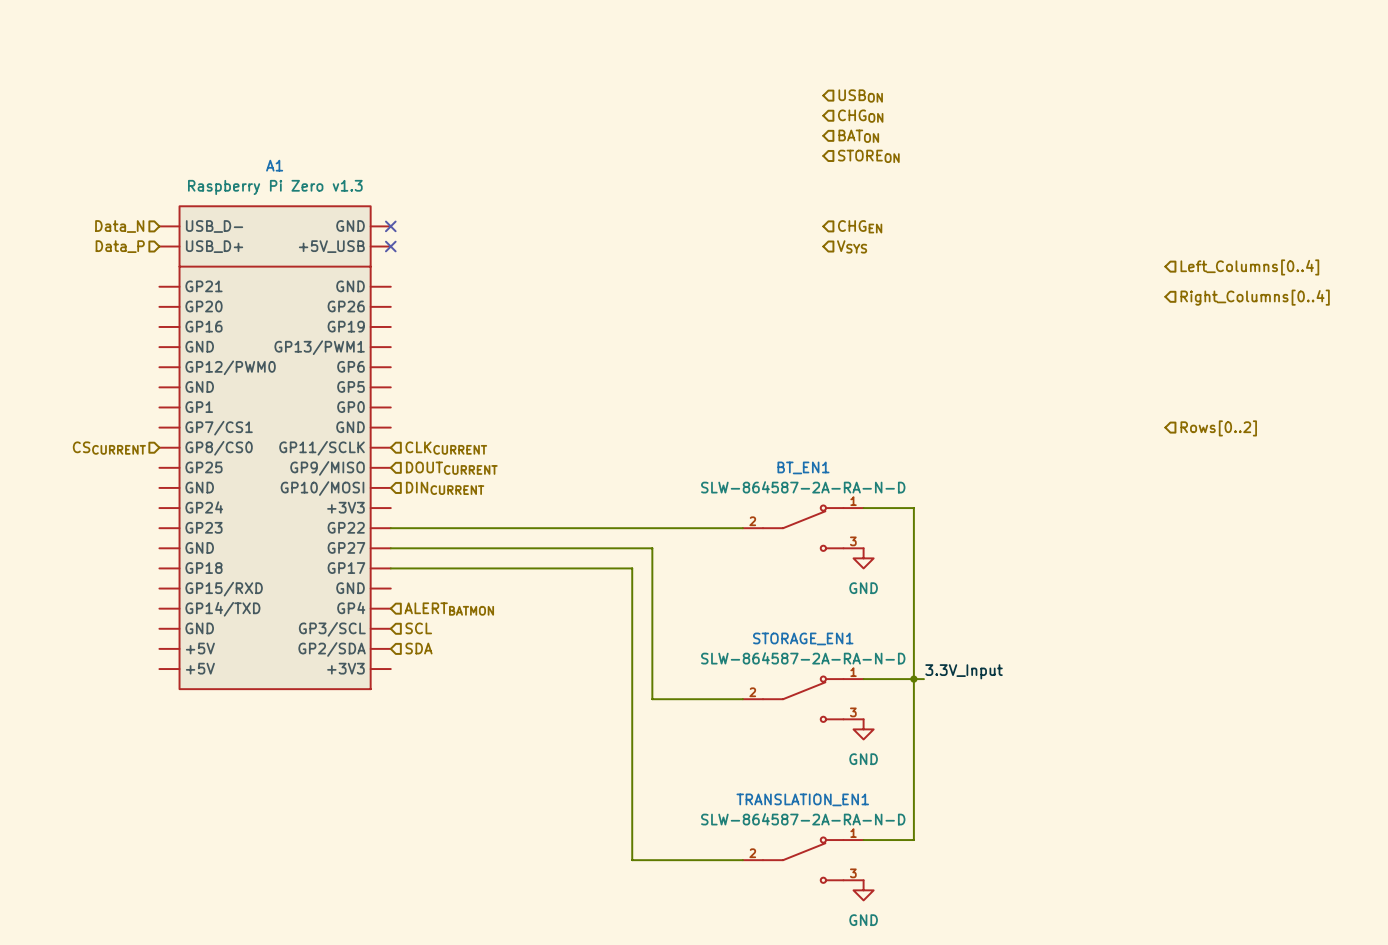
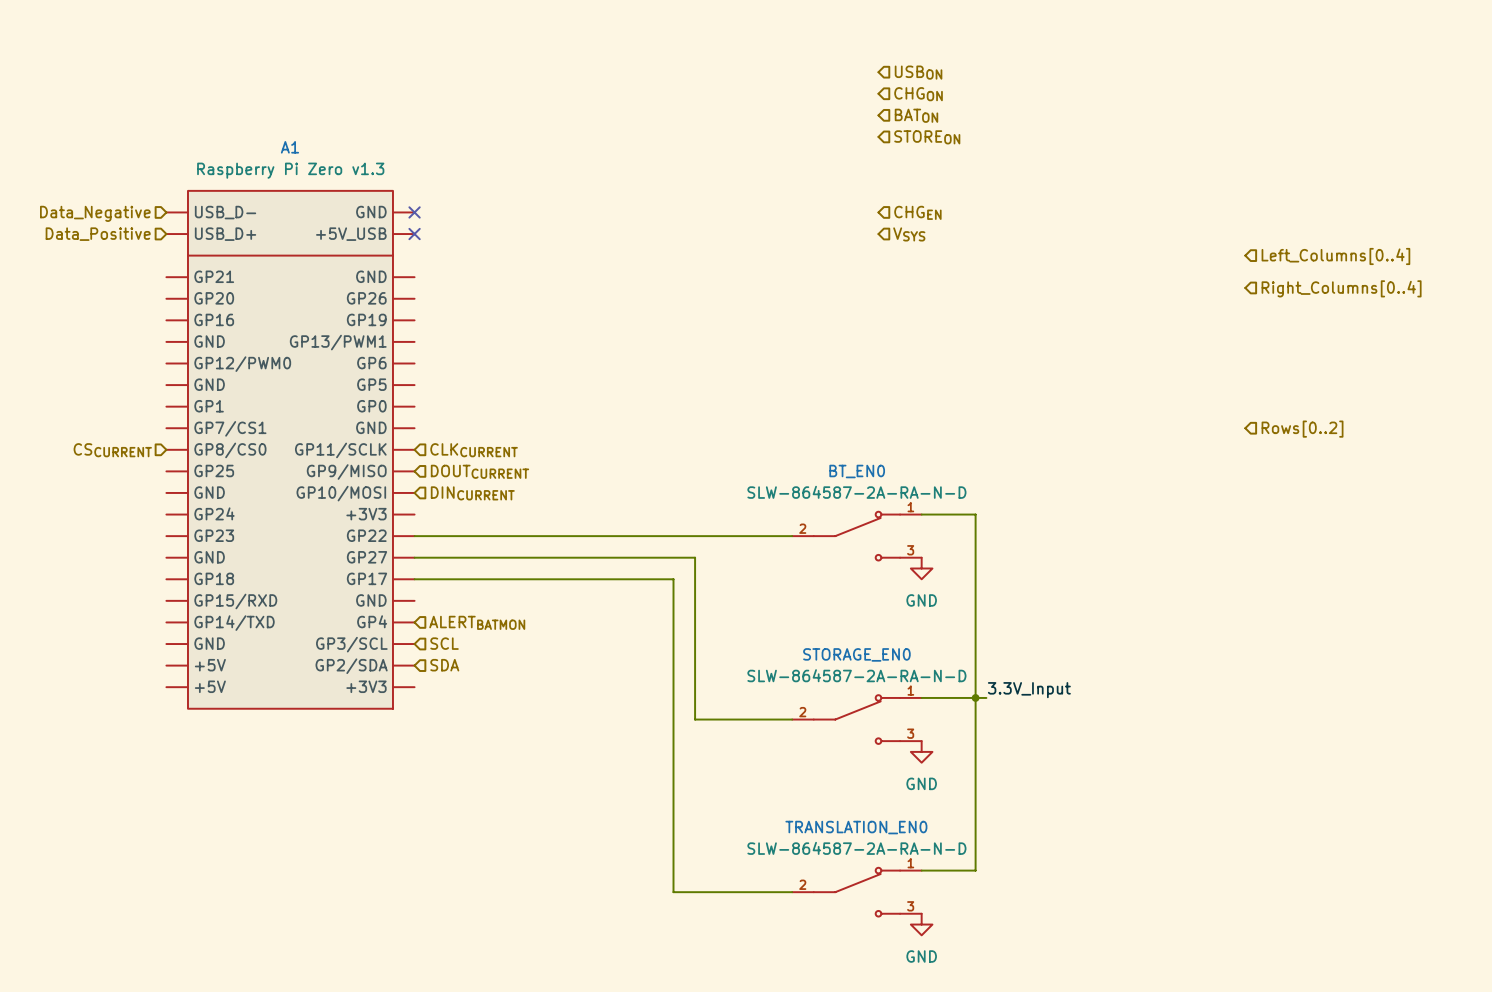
hierarchical label: Data_N (119, 226) -> Data_Negative (95, 213)
hierarchical label: Data_P (120, 246) -> Data_Positive (98, 234)
BT_EN1 name: BT_EN1 (803, 467) -> BT_EN0 (857, 471)
STORAGE_EN1 name: STORAGE_EN1 (803, 638) -> STORAGE_EN0 (856, 654)
TRANSLATION_EN1 name: TRANSLATION_EN1 (802, 799) -> TRANSLATION_EN0 (856, 827)

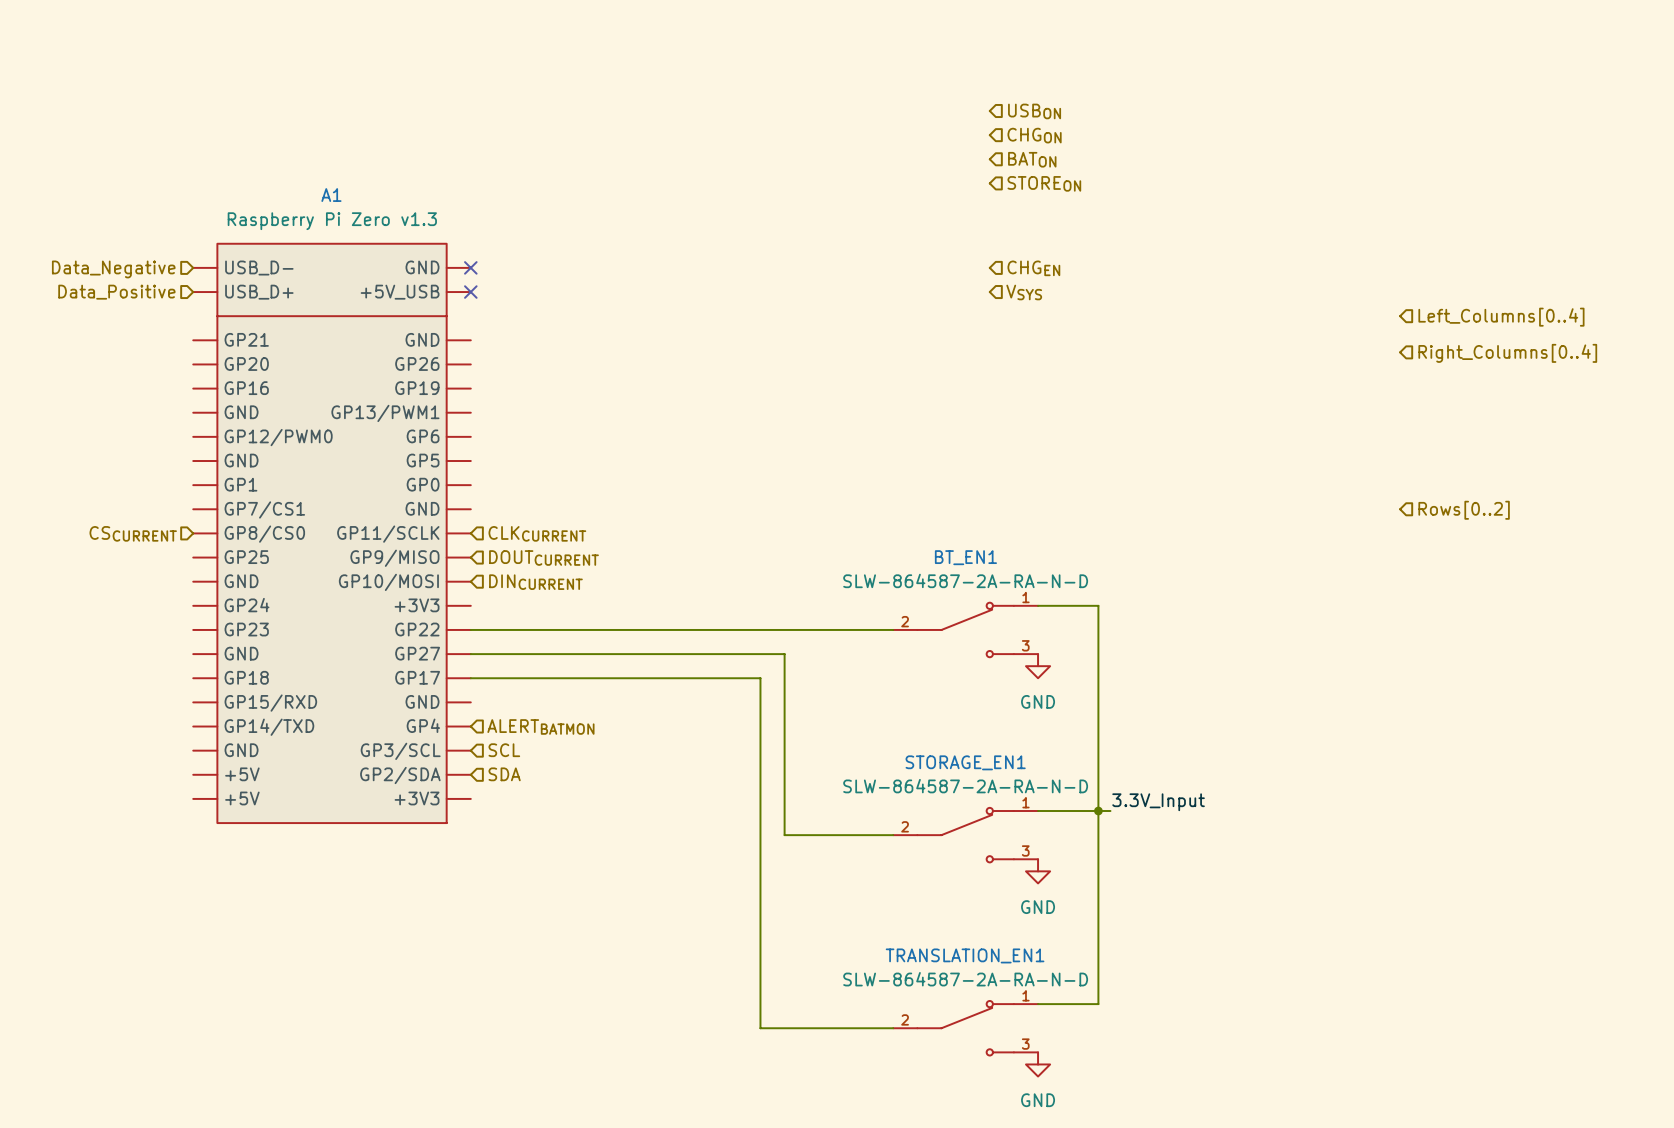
BT_EN0 name: BT_EN0 (857, 471) -> BT_EN1 (965, 557)
STORAGE_EN0 name: STORAGE_EN0 (856, 654) -> STORAGE_EN1 (965, 762)
TRANSLATION_EN0 name: TRANSLATION_EN0 (856, 827) -> TRANSLATION_EN1 (965, 955)

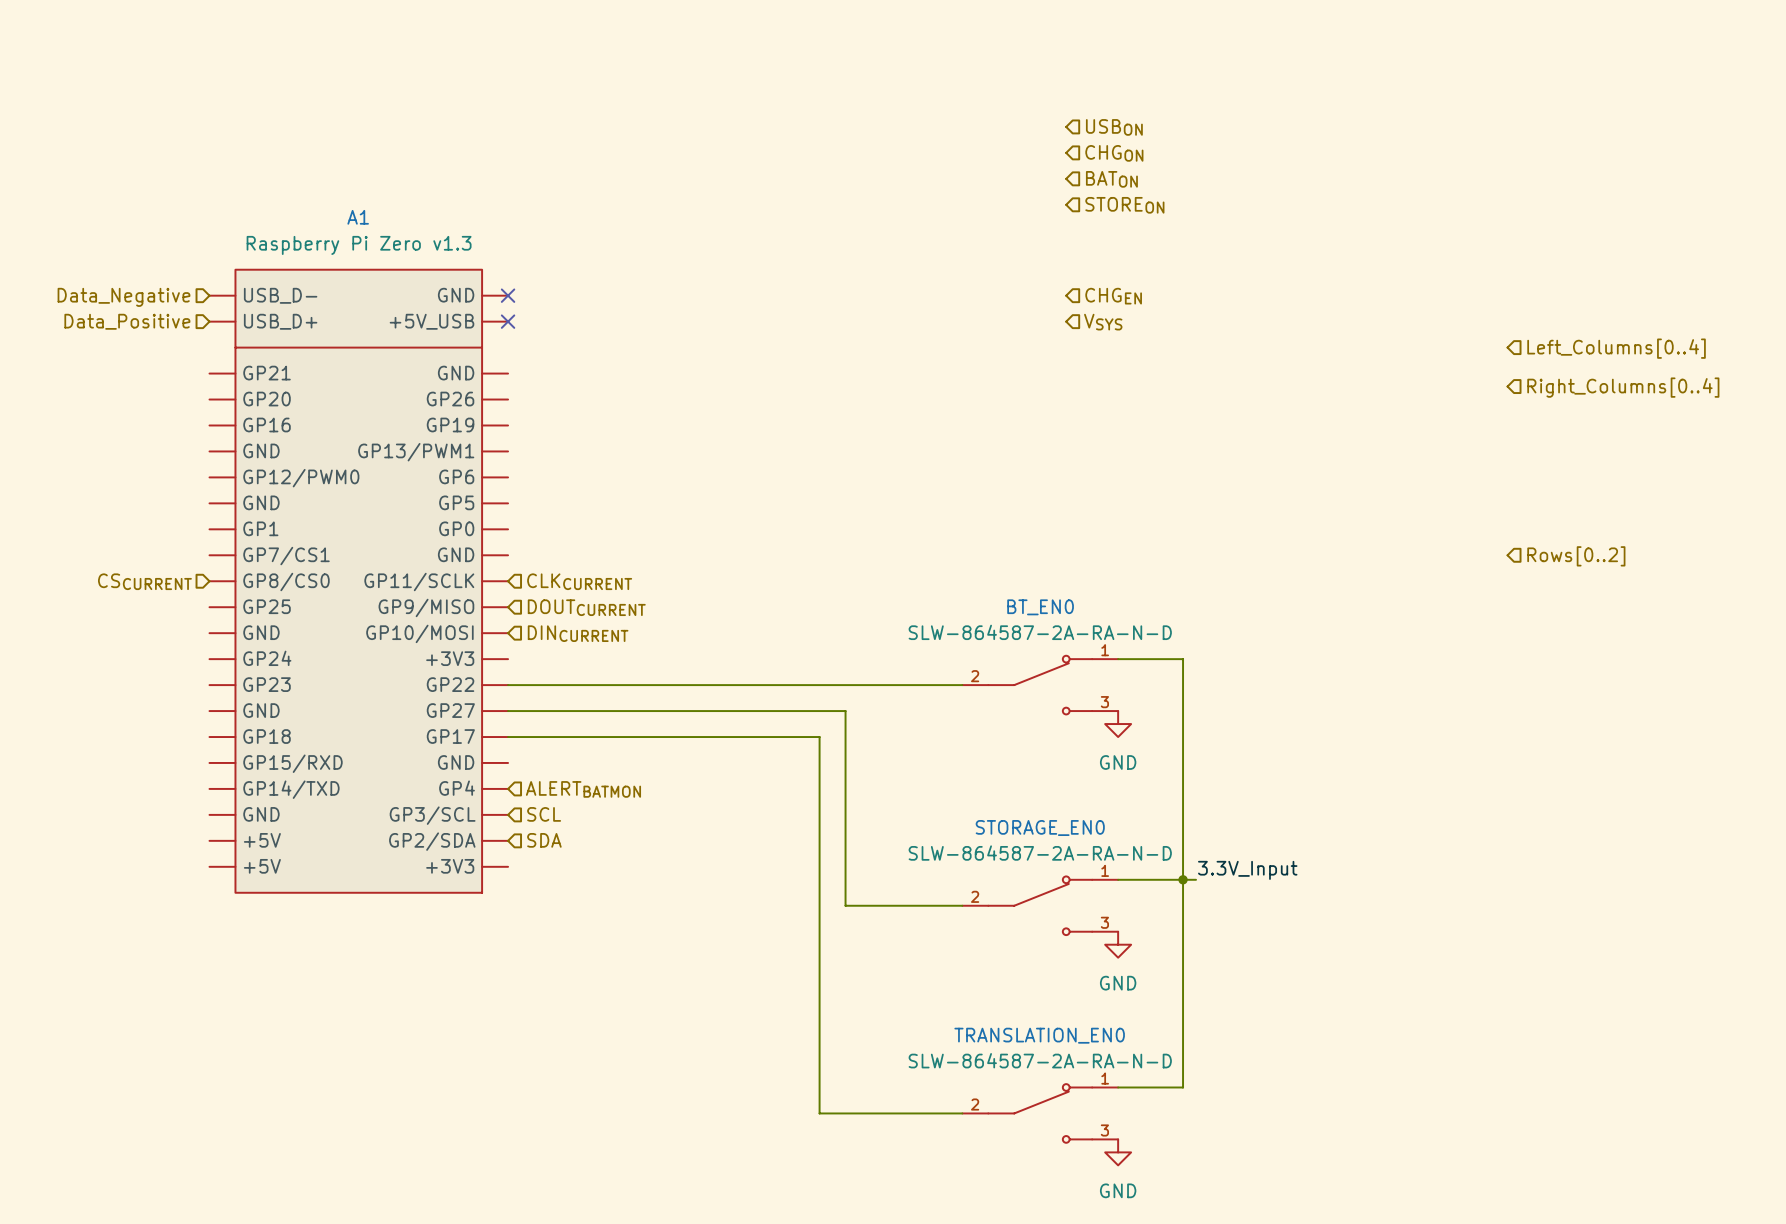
BT_EN1 name: BT_EN1 (965, 557) -> BT_EN0 (1040, 607)
STORAGE_EN1 name: STORAGE_EN1 (965, 762) -> STORAGE_EN0 (1040, 828)
TRANSLATION_EN1 name: TRANSLATION_EN1 (965, 955) -> TRANSLATION_EN0 (1039, 1035)

